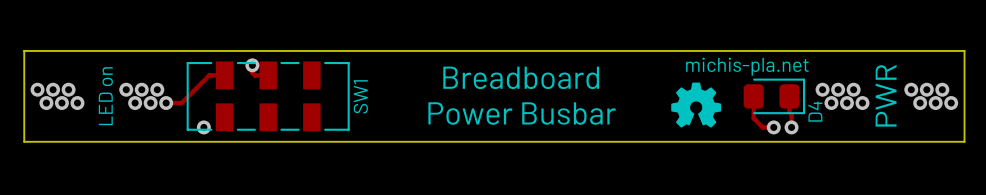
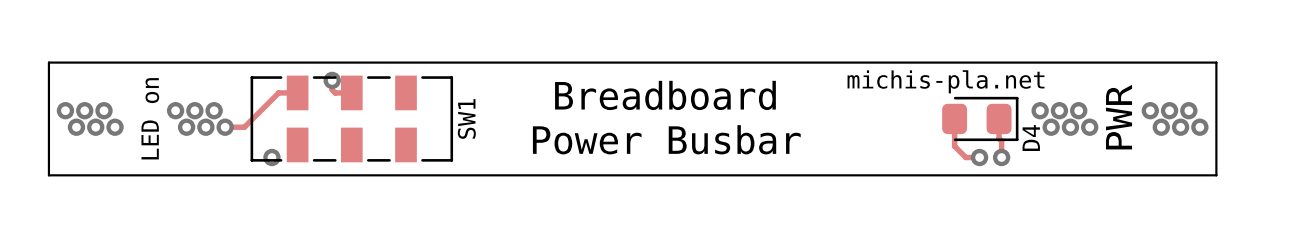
drawing: [671, 82, 722, 128] -> none

